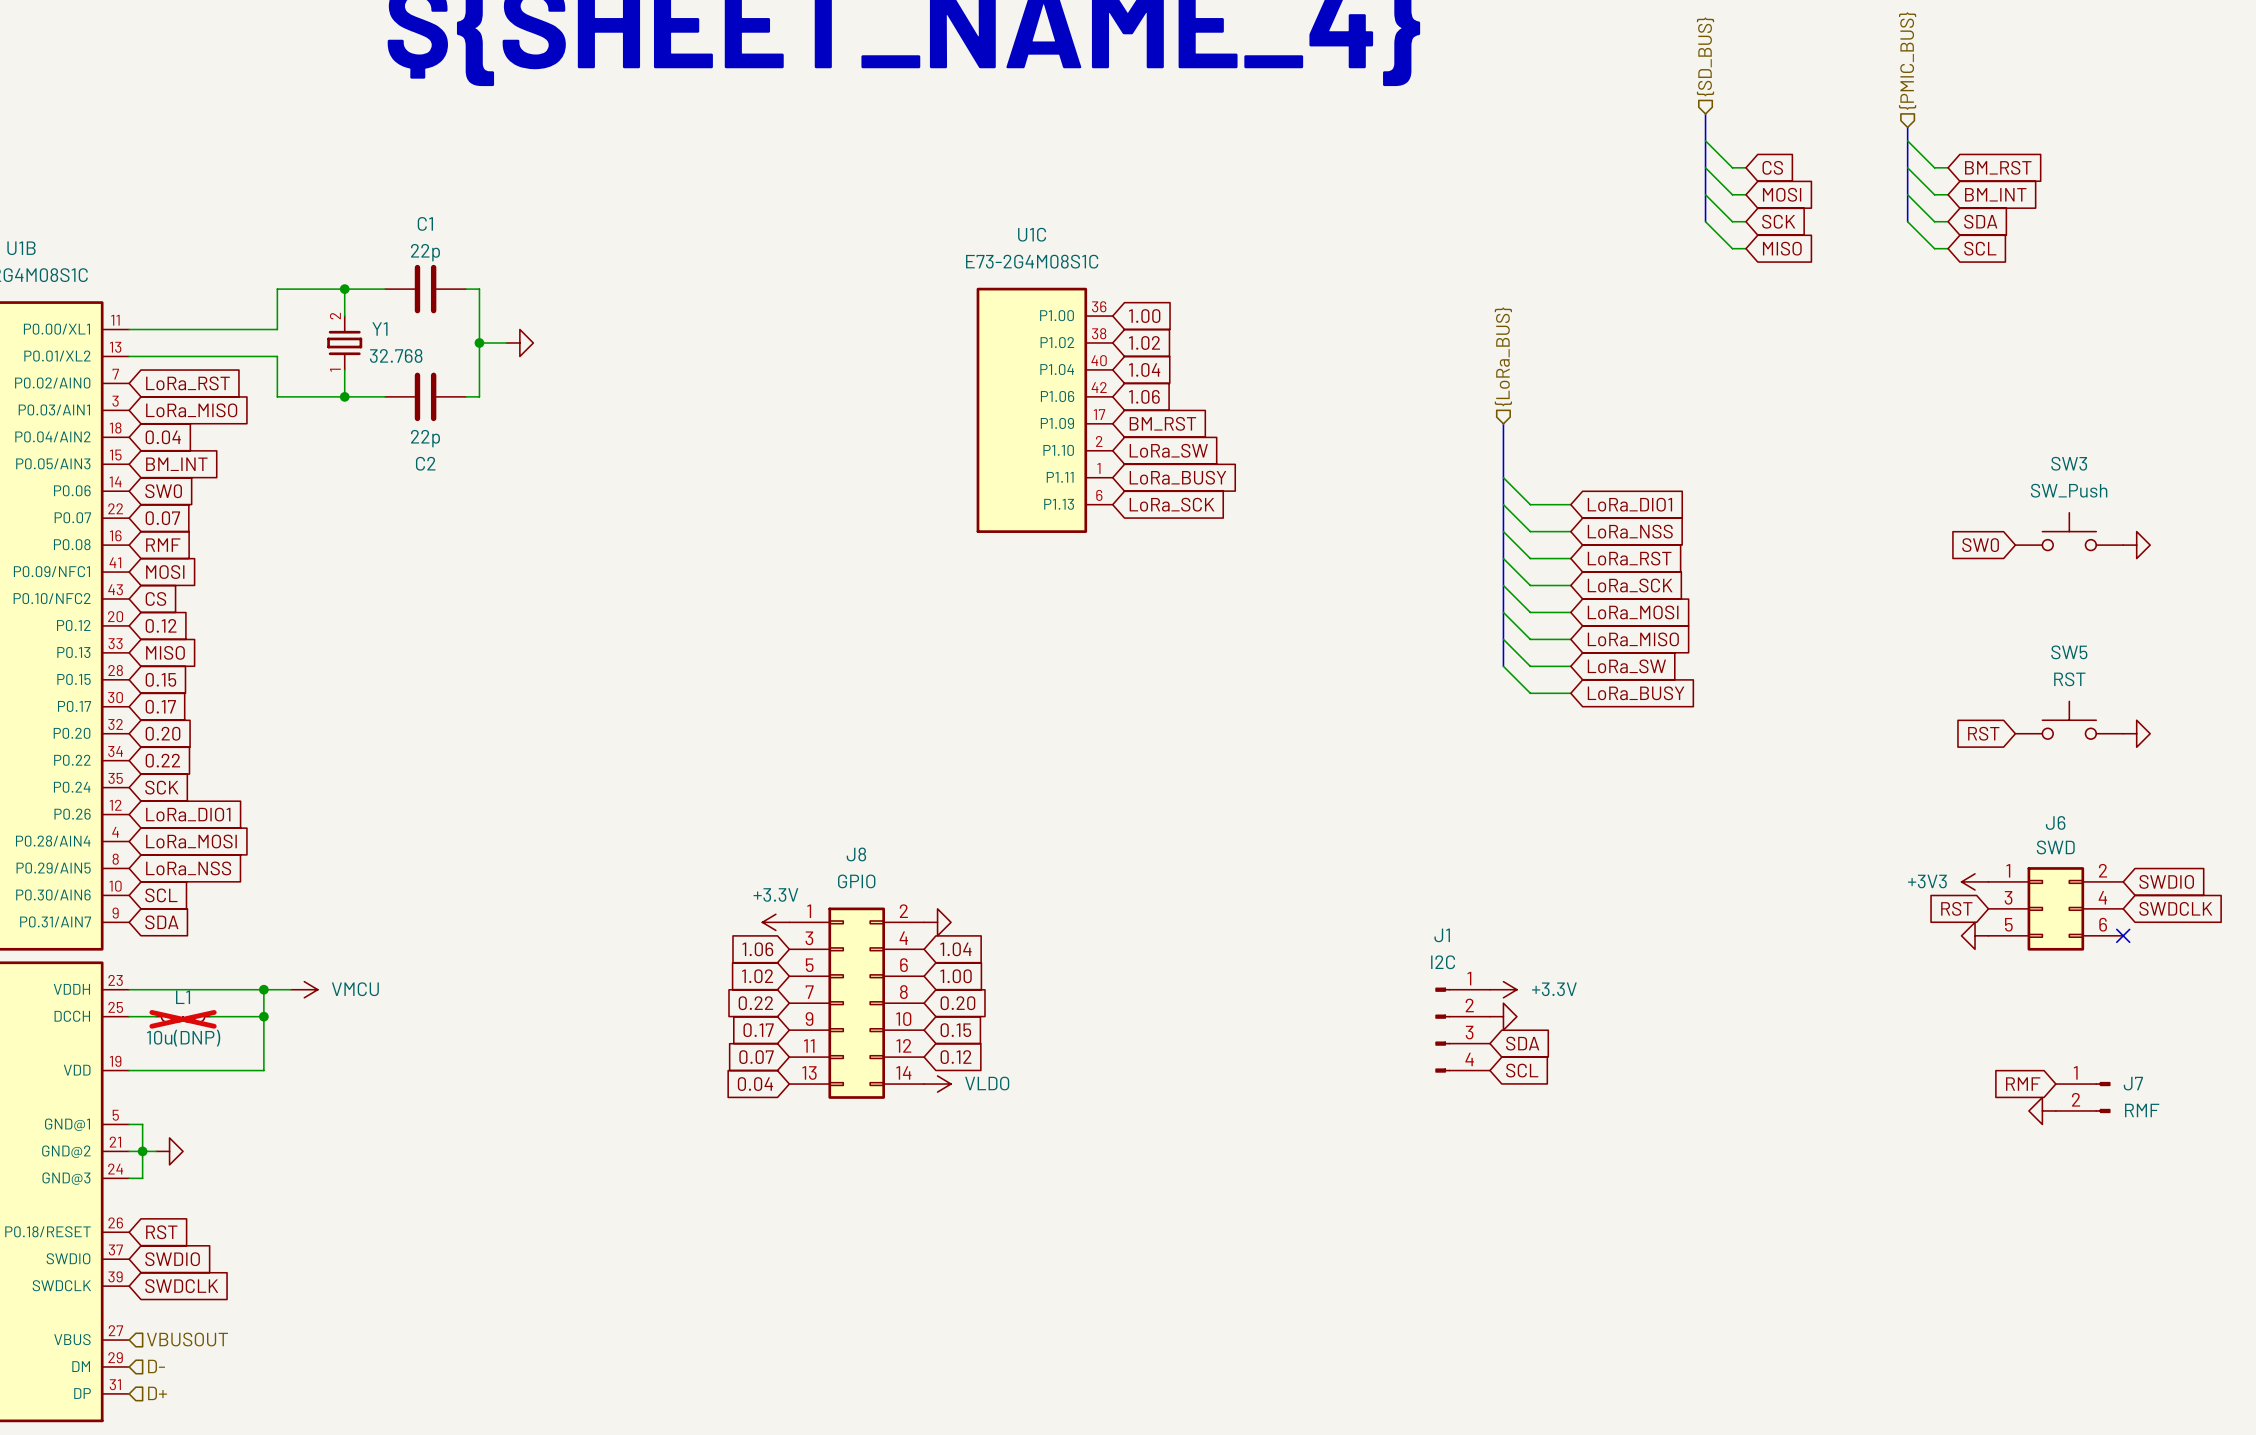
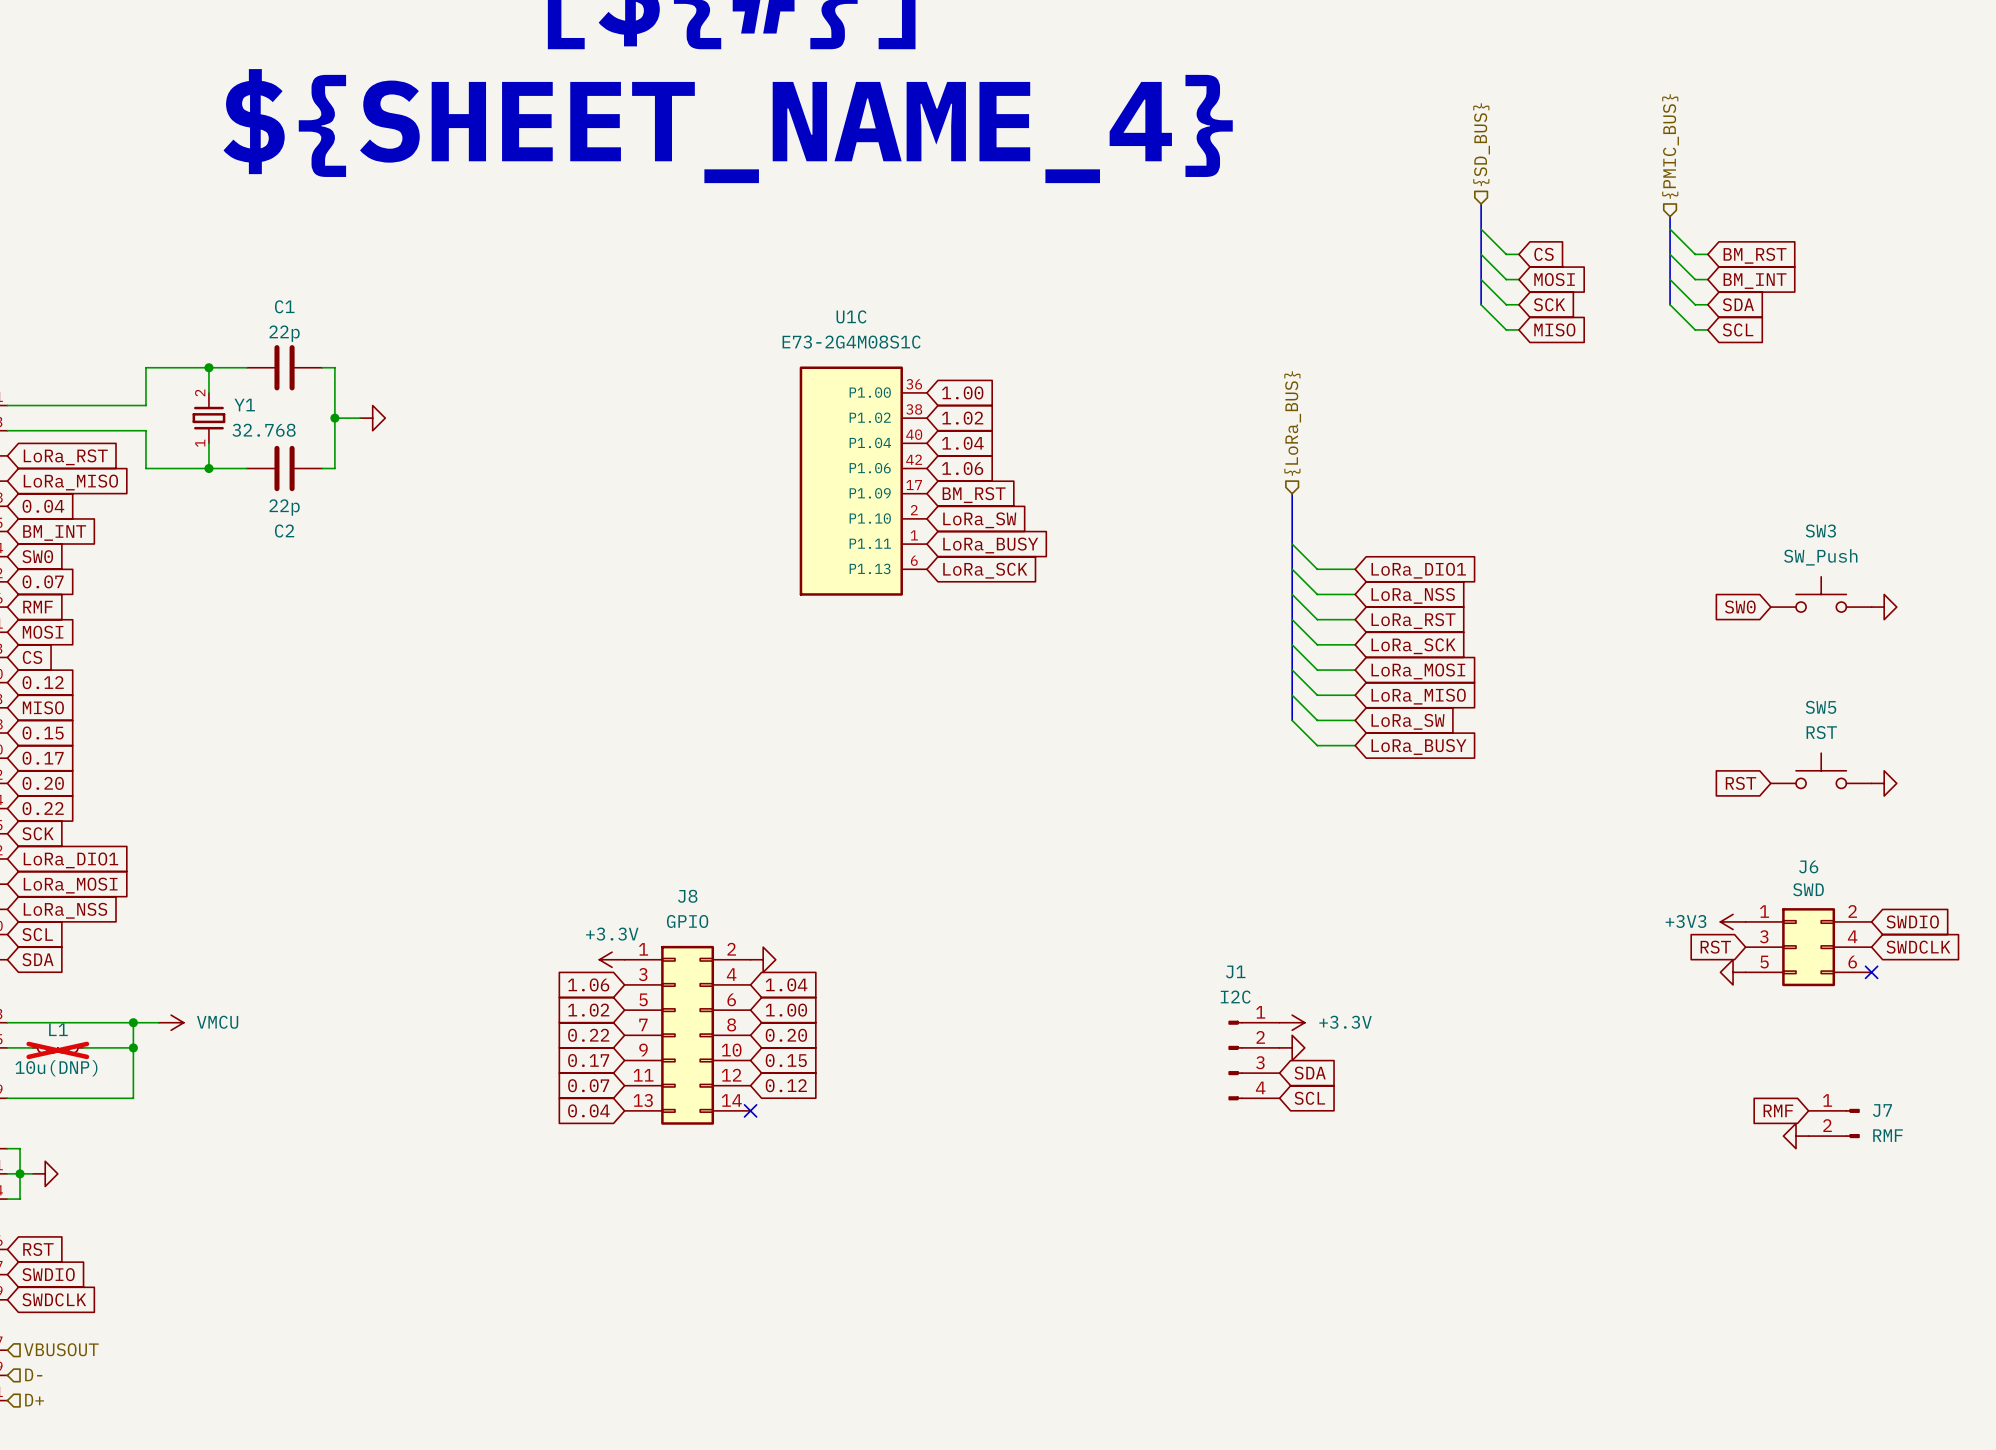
no-connect mark: none -> (750, 1110)
power symbol: VLDO (937, 1084) -> none

